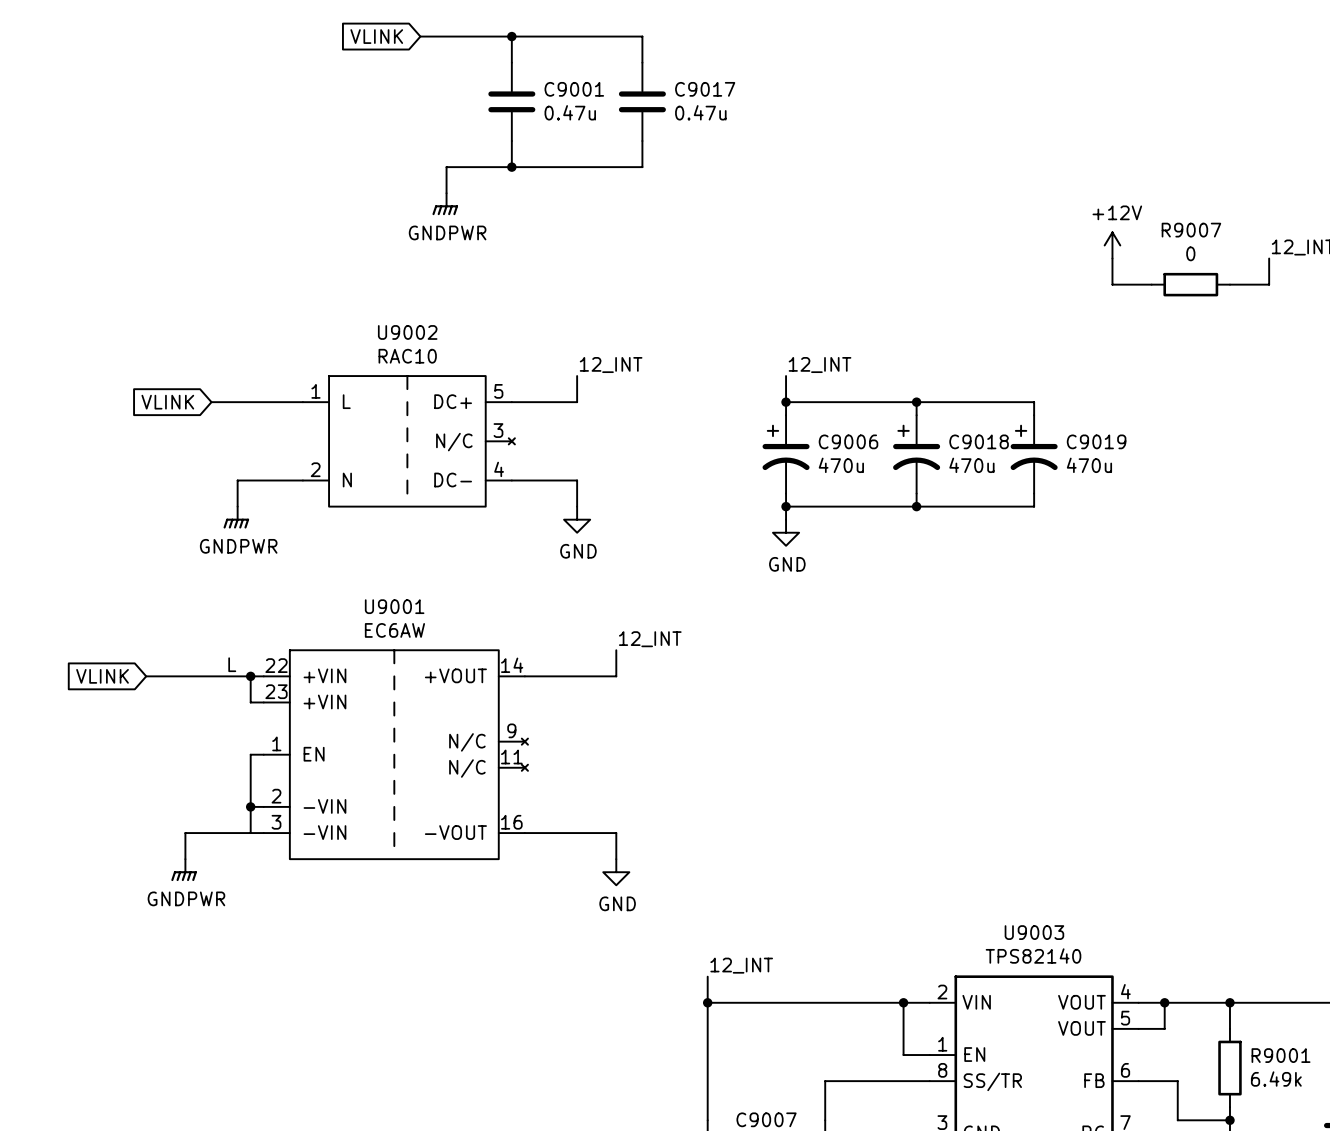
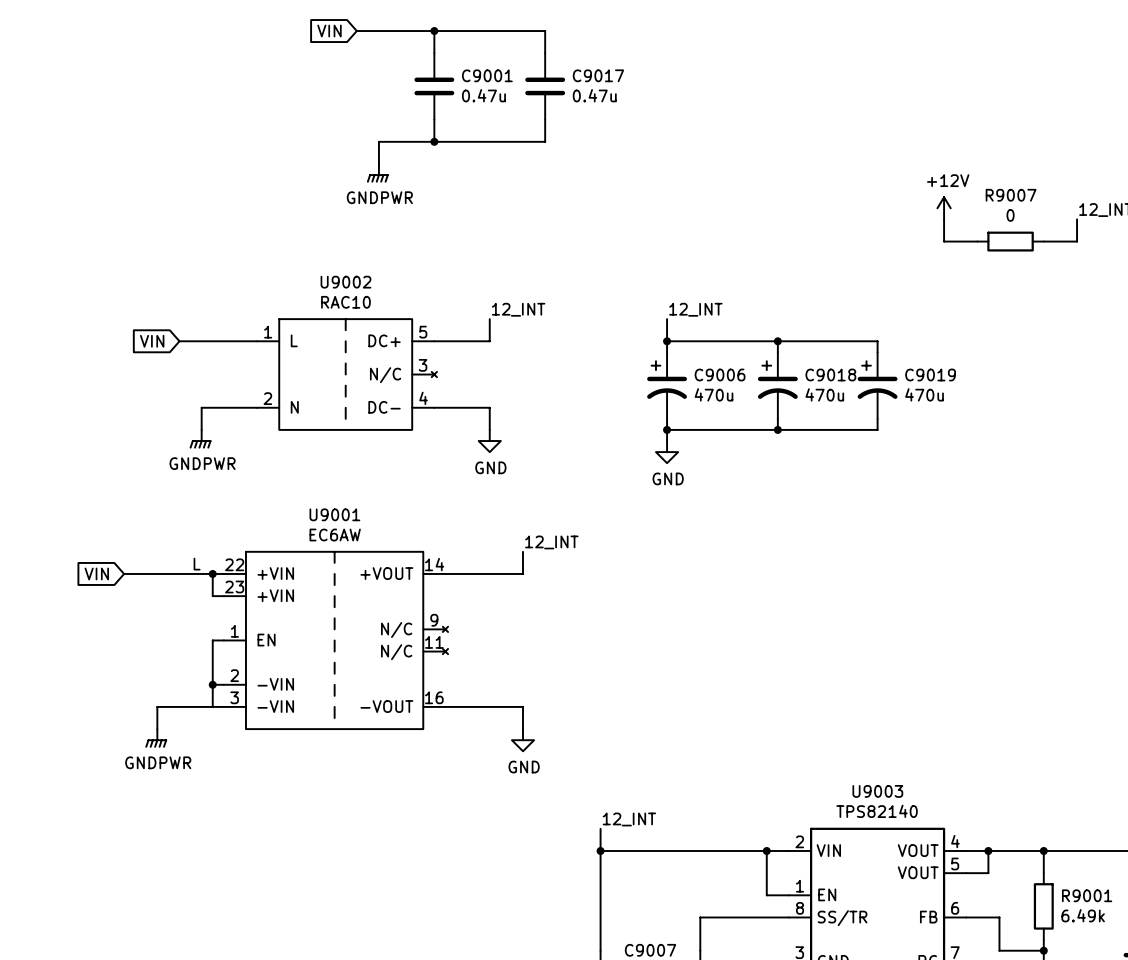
global label: VLINK (376, 36) -> VIN (329, 31)
global label: VLINK (167, 402) -> VIN (152, 341)
global label: VLINK (102, 676) -> VIN (96, 573)

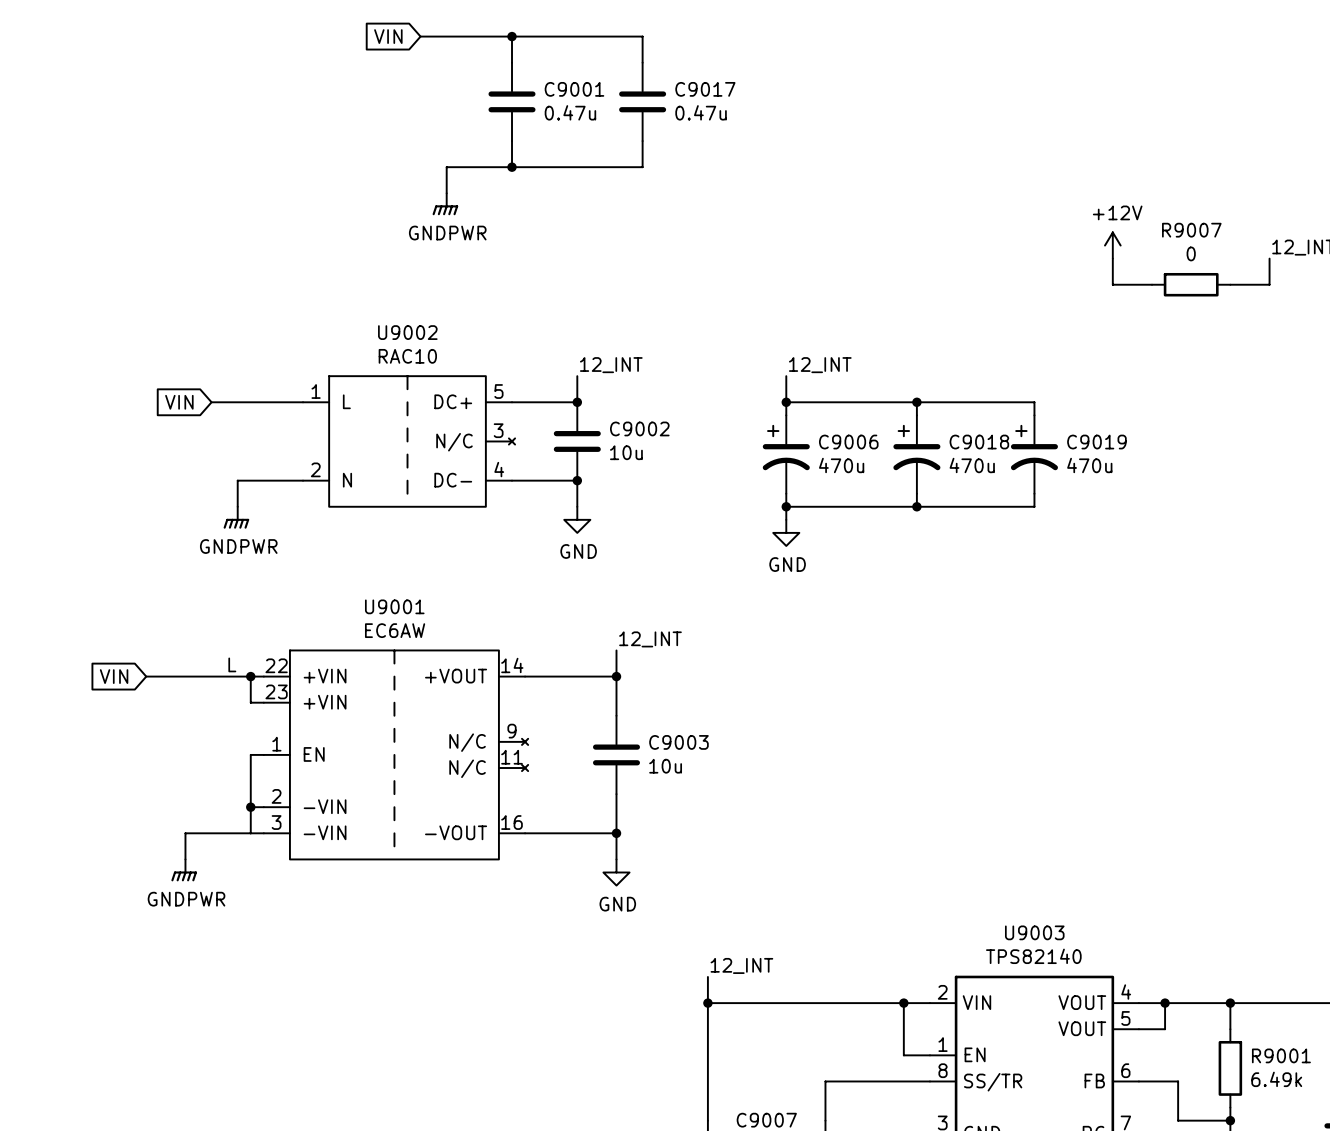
junction: none -> (577, 402)
C9002: none -> 10u (577, 441)
junction: none -> (577, 480)
wire: none -> (616, 676) (616, 715)
junction: none -> (616, 676)
C9003: none -> 10u (616, 754)
wire: none -> (616, 794) (616, 833)
junction: none -> (616, 833)

